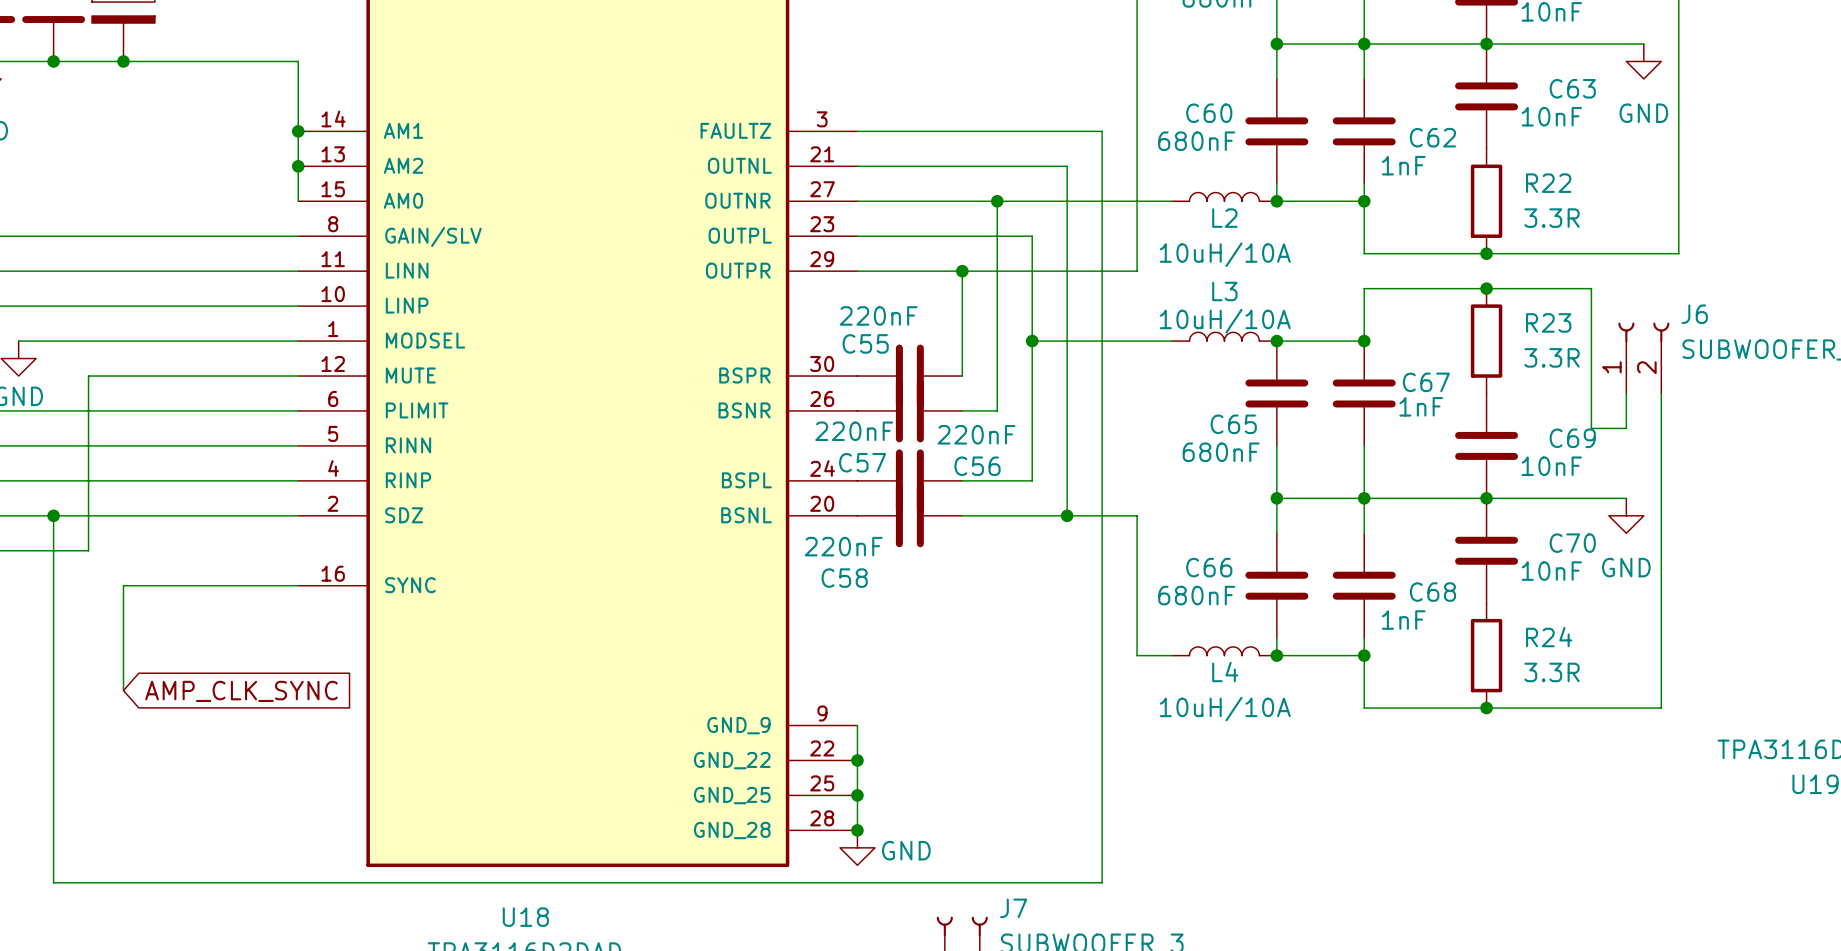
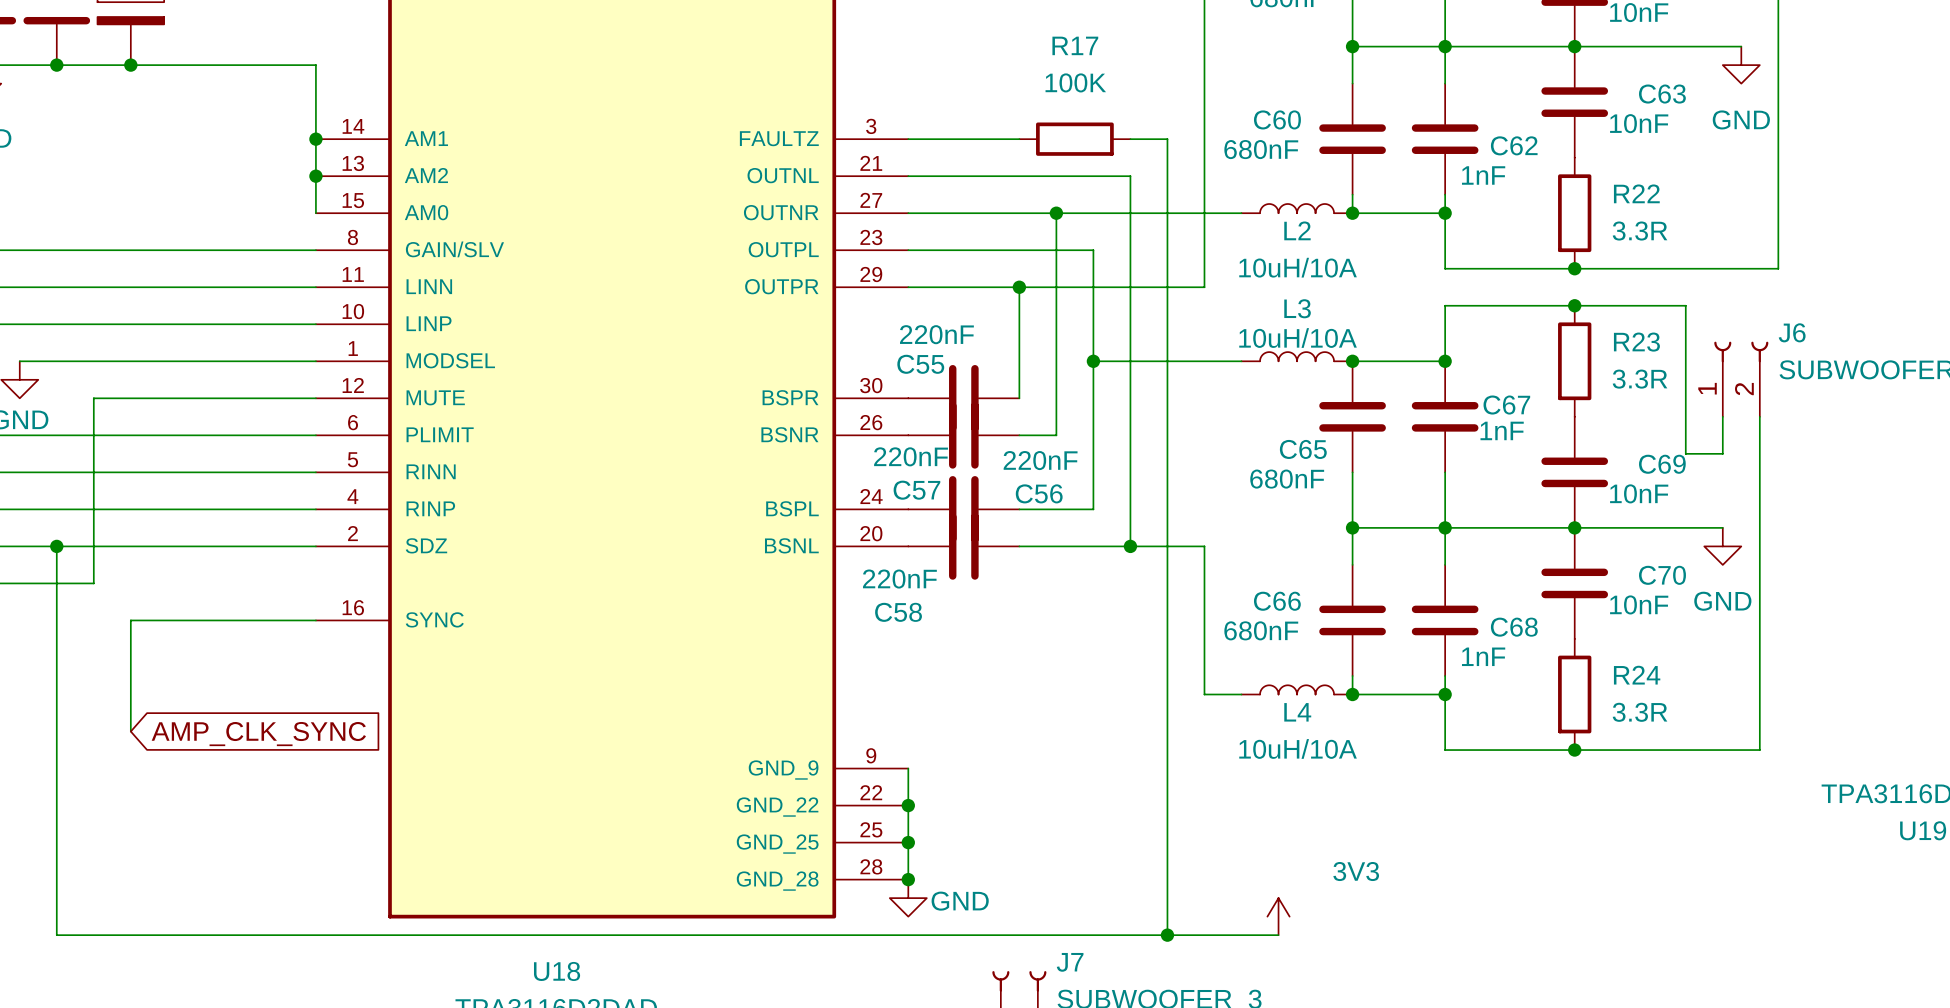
wire: (962, 131) (1067, 131) -> none
R17: none -> 100K (1074, 139)
power symbol: none -> 3V3 (1278, 916)
wire: none -> (1167, 935) (1278, 935)
junction: none -> (1167, 935)

